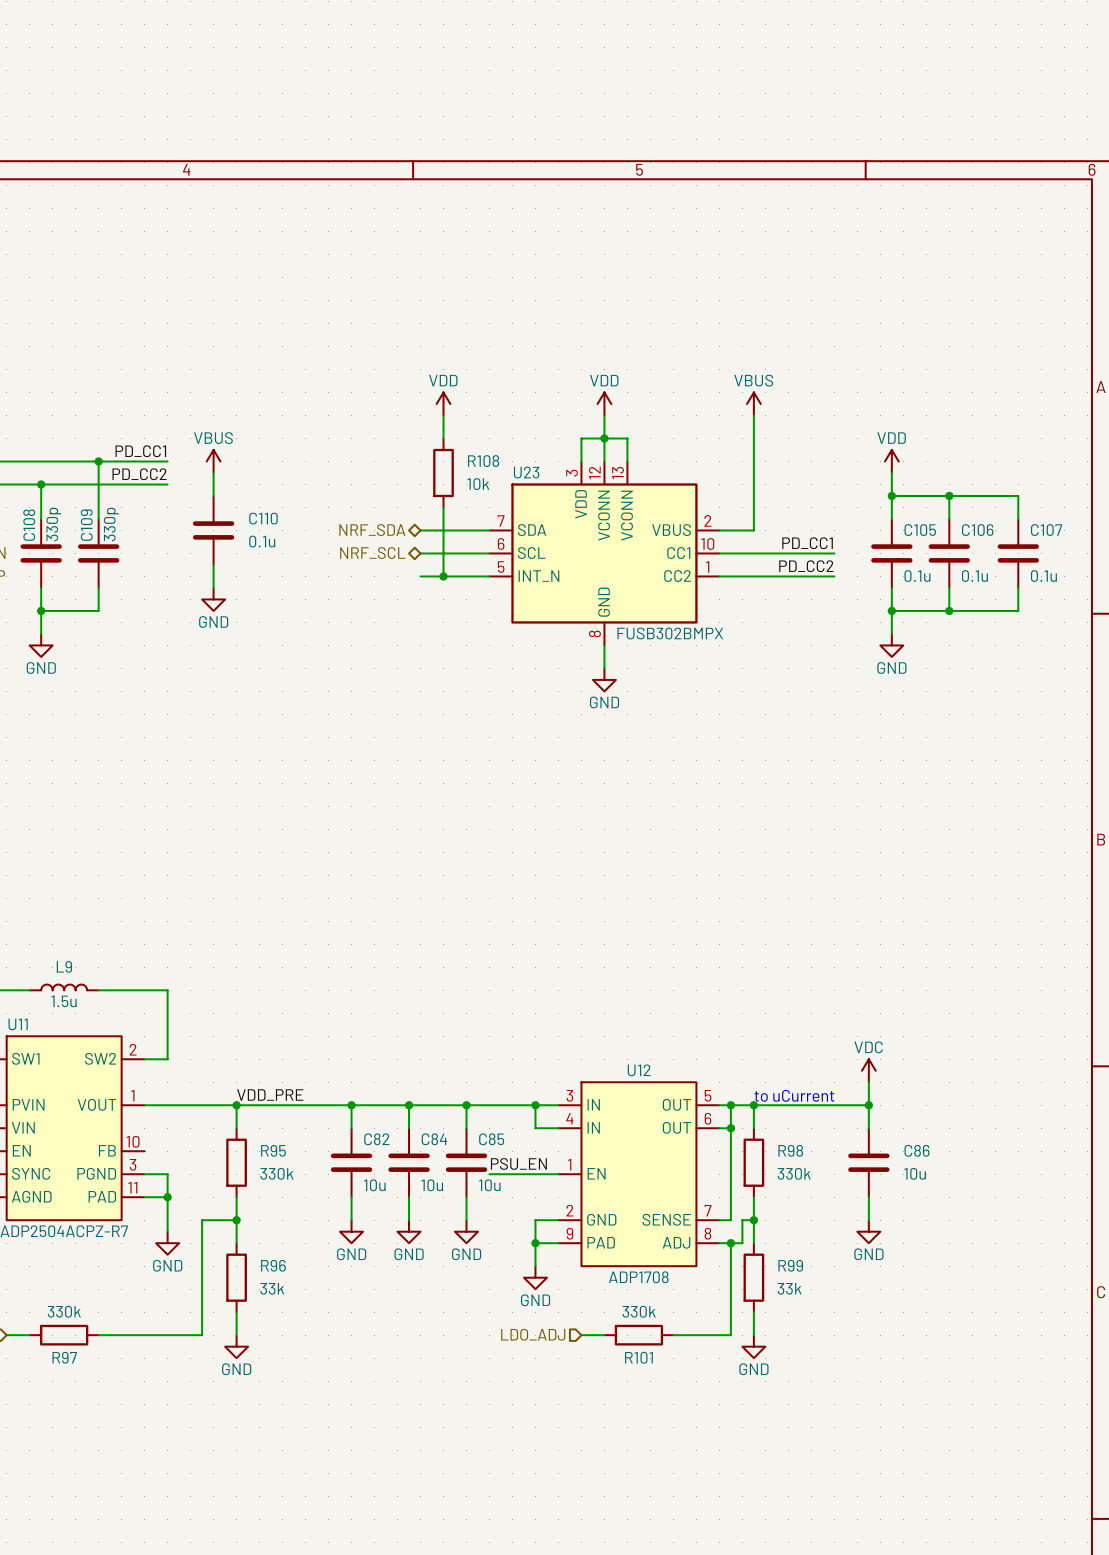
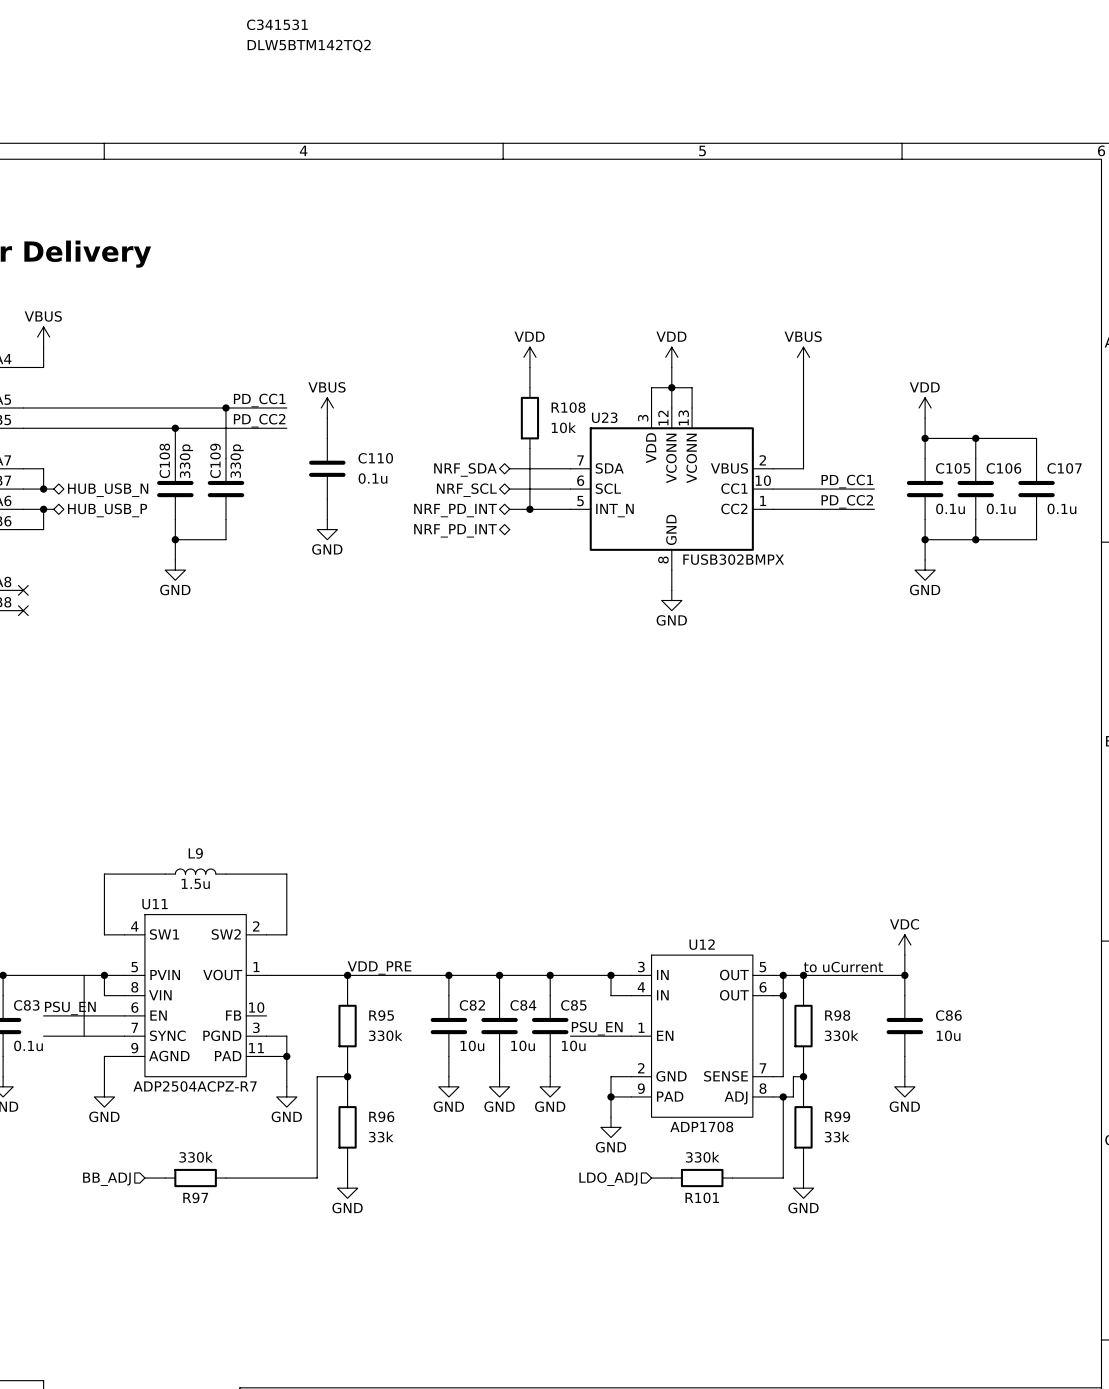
text: none -> C341531 (277, 24)
text: none -> DLW5BTM142TQ2 (309, 45)
hierarchical label: none -> NRF_PD_INT (455, 510)
hierarchical label: none -> NRF_PD_INT (455, 530)

